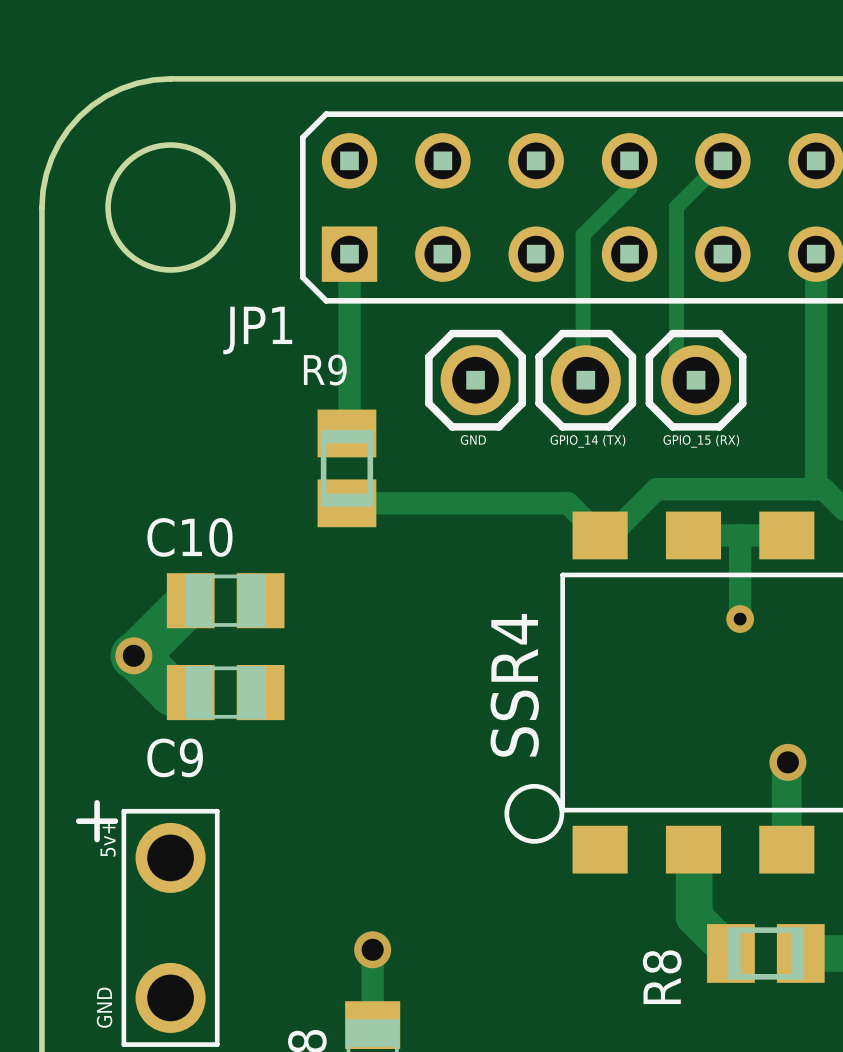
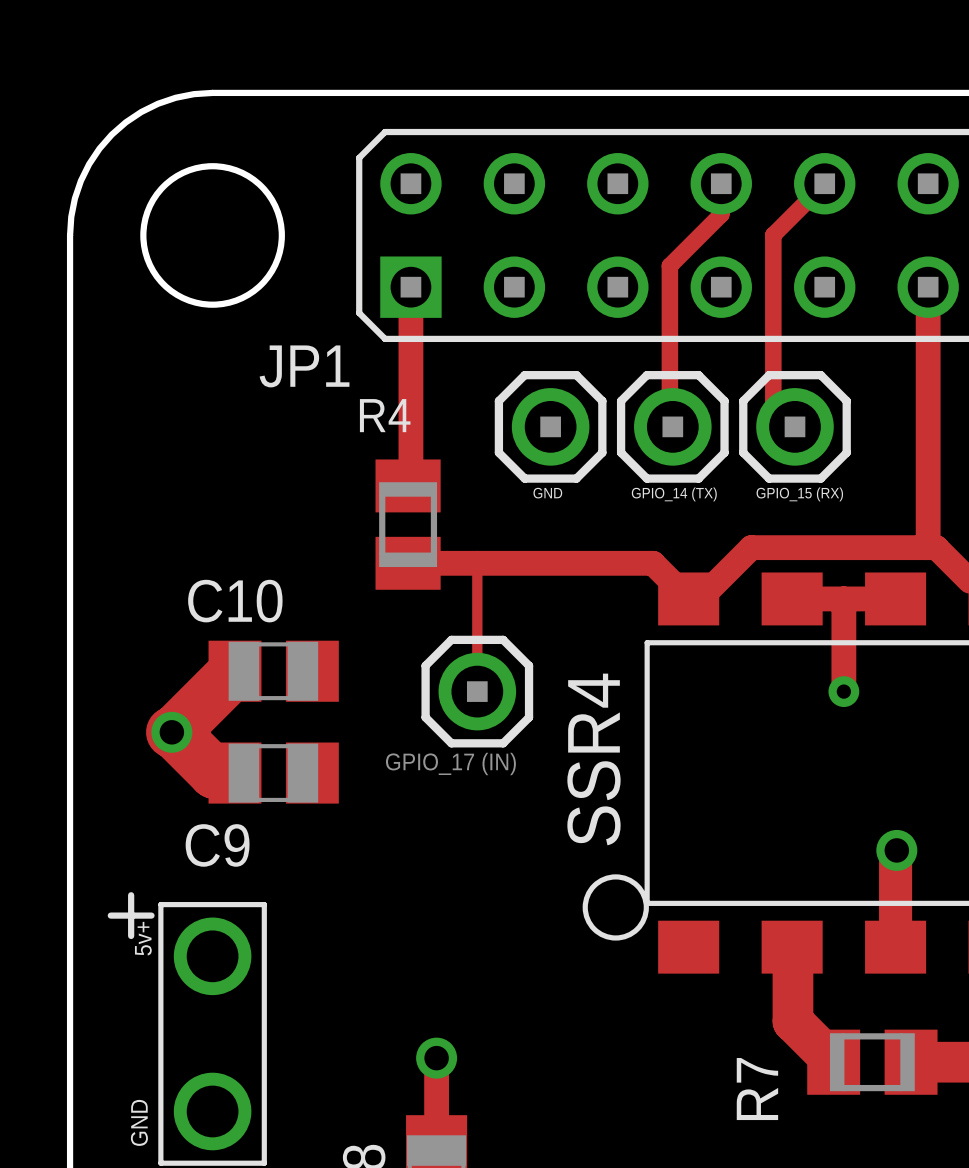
R9 name: R9 (325, 370) -> R4 (385, 415)
track: none -> (477, 563) (477, 691)
part: none -> GPIO_17 (IN) (477, 691)
R8 name: R8 (662, 977) -> R7 (757, 1089)

